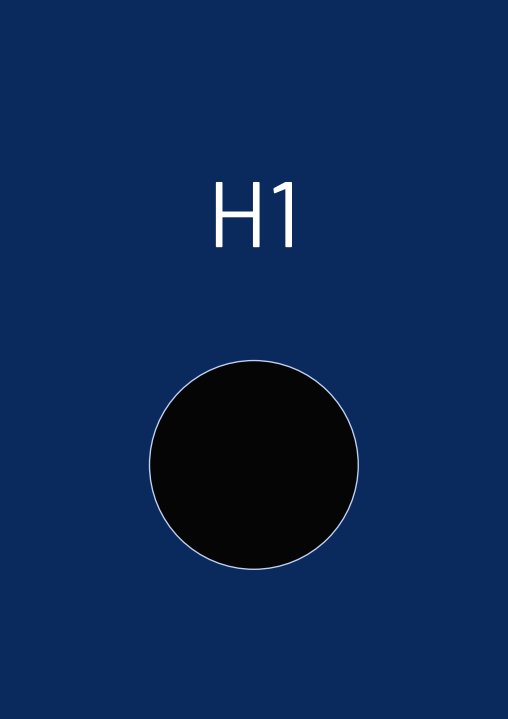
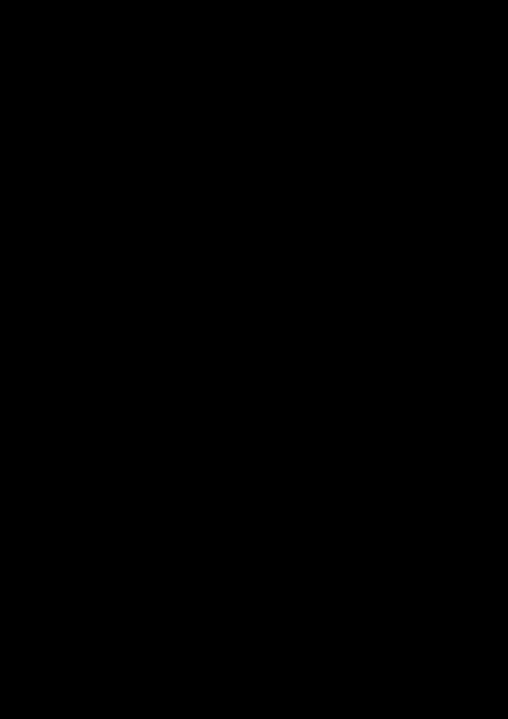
H1: (253, 464) -> none

